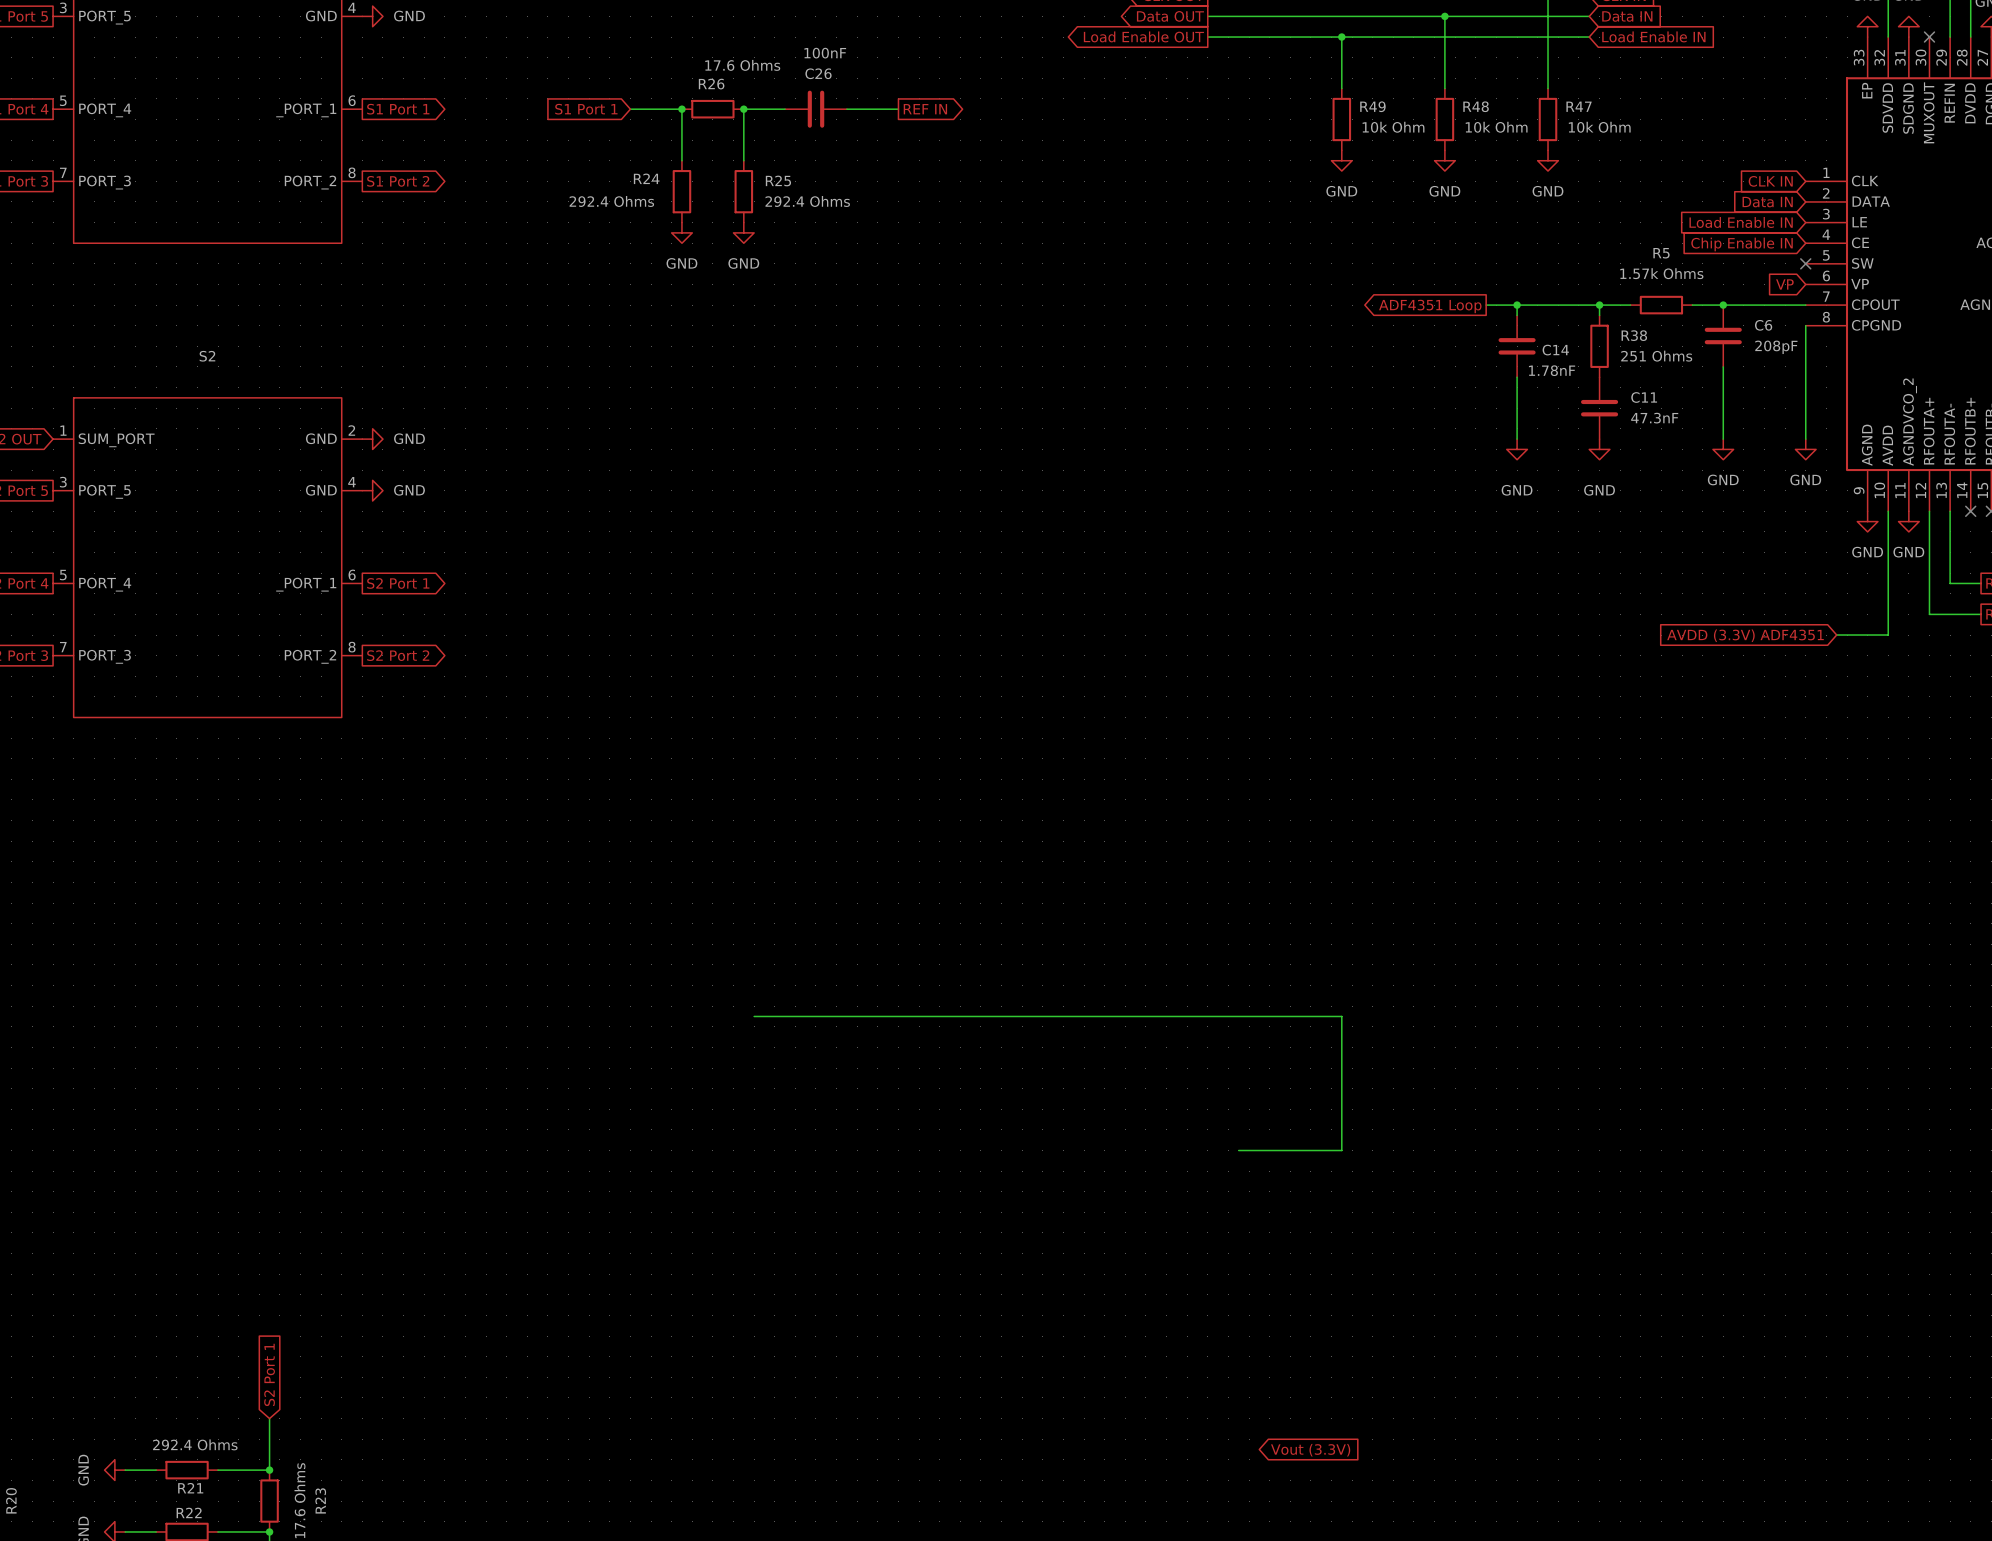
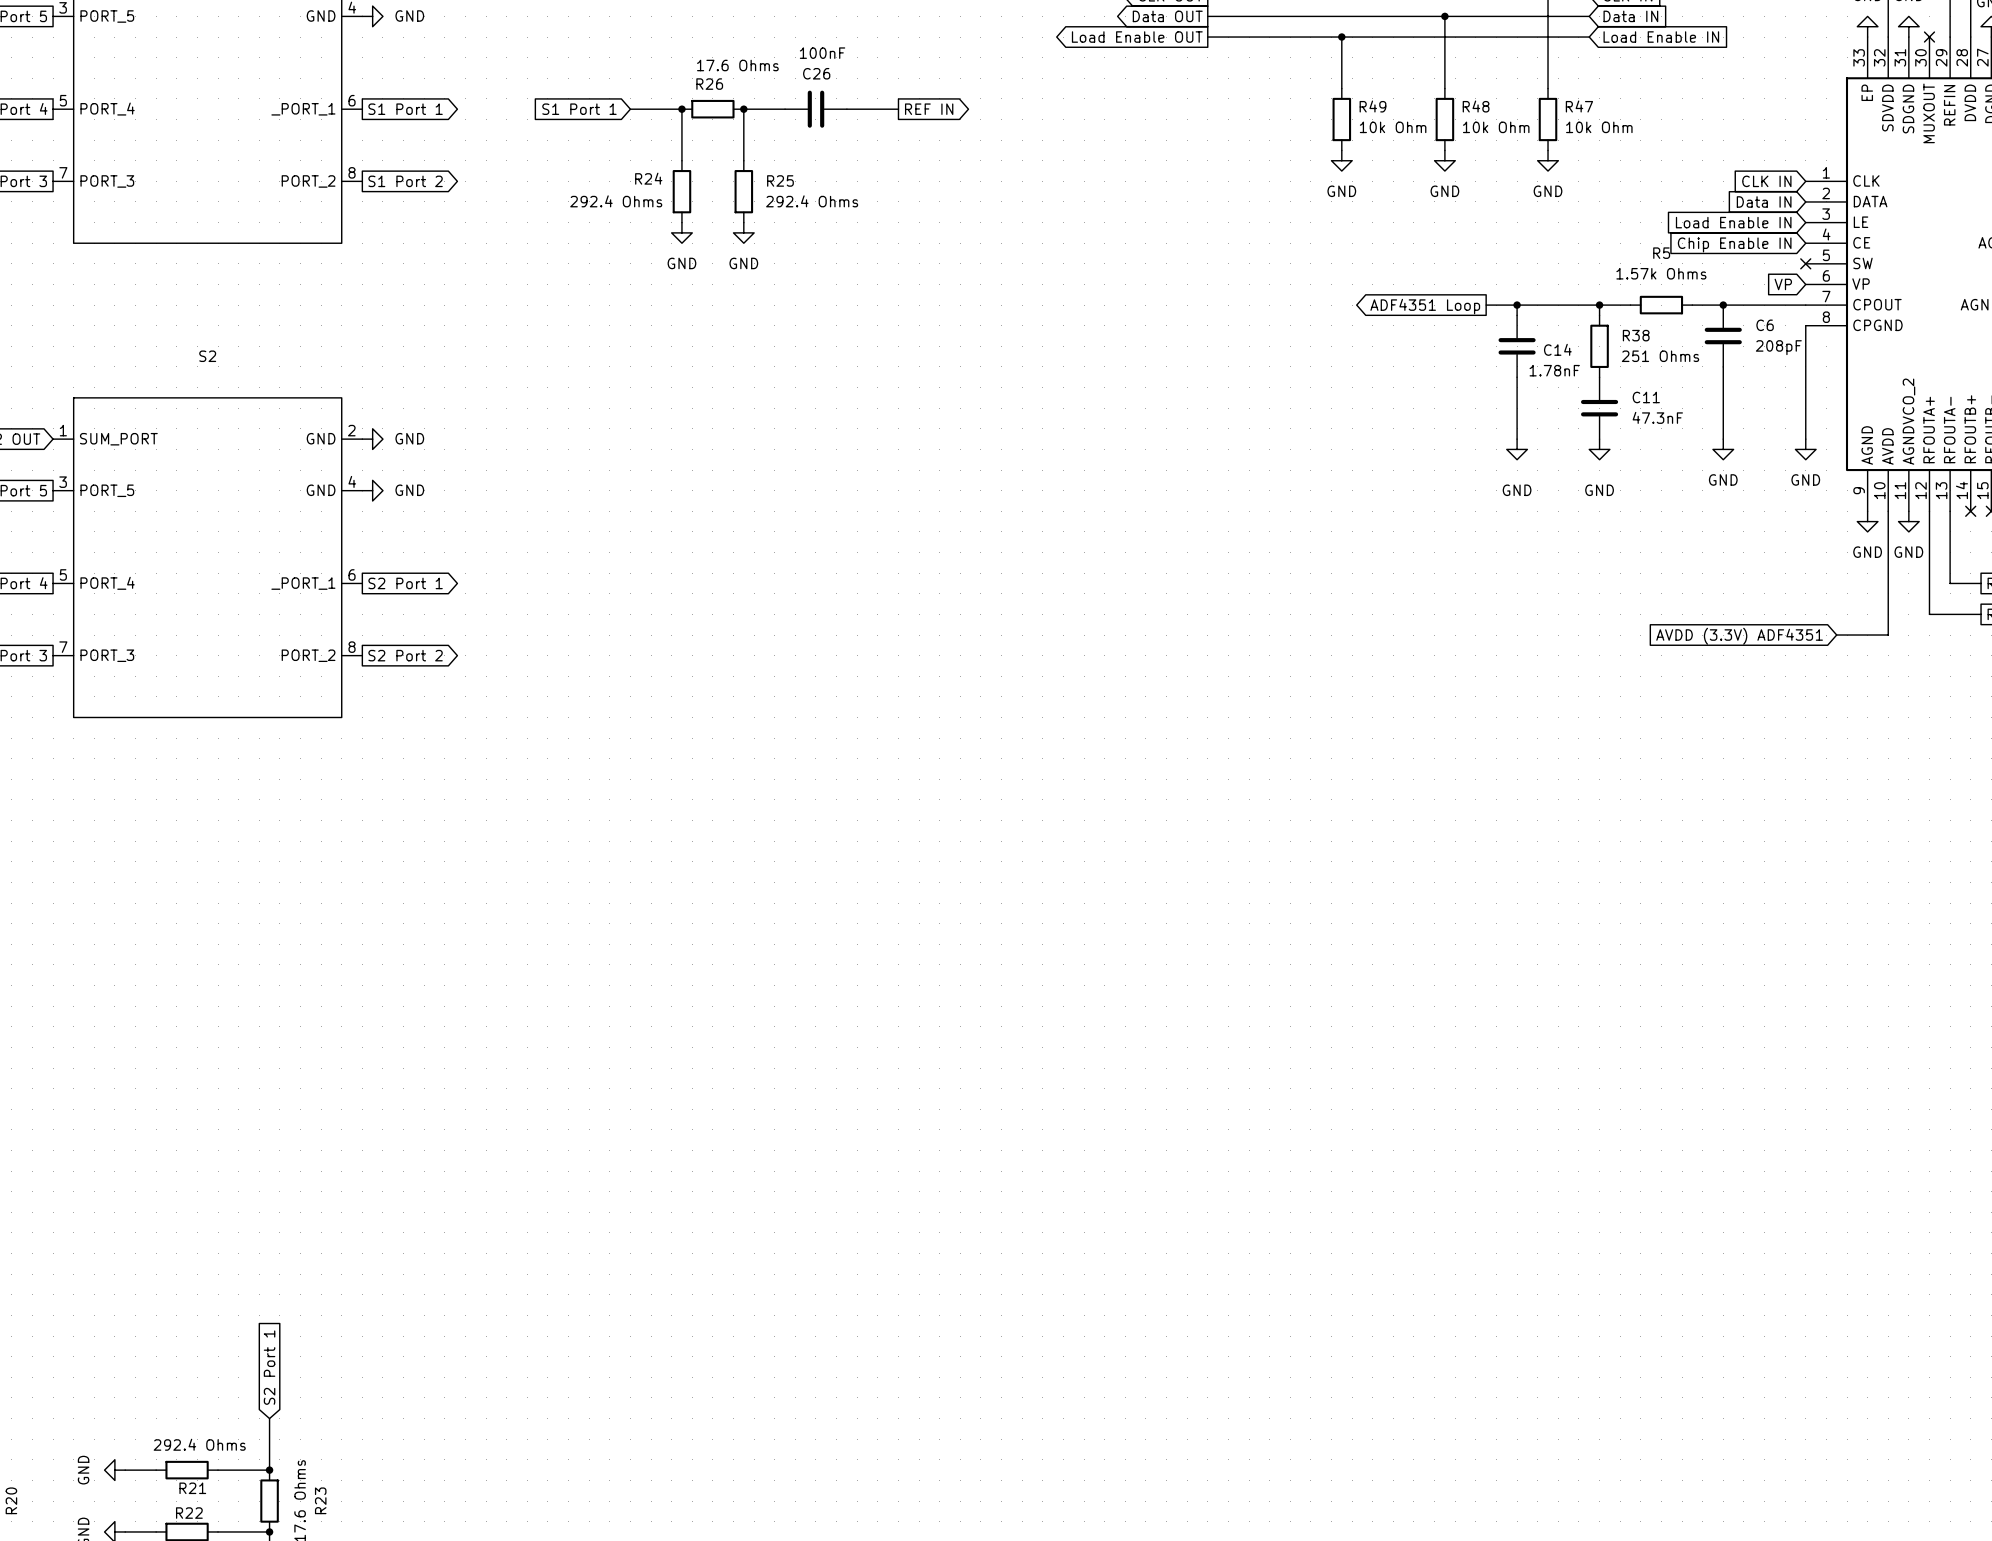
wire: (754, 1016) (1341, 1016) (1341, 1150) (1238, 1150) -> none
global label: Vout (3.3V) (1310, 1450) -> none

